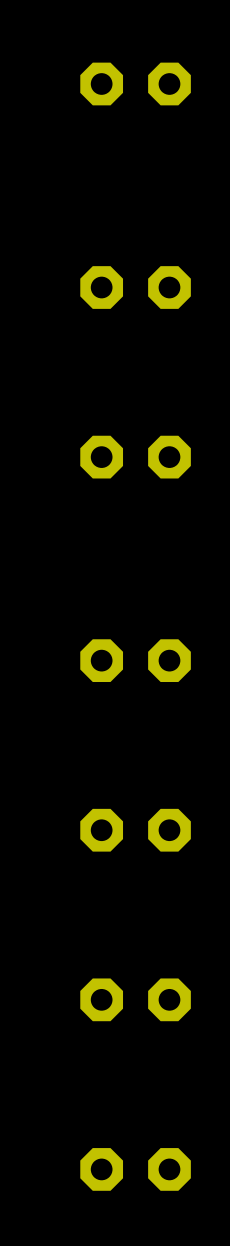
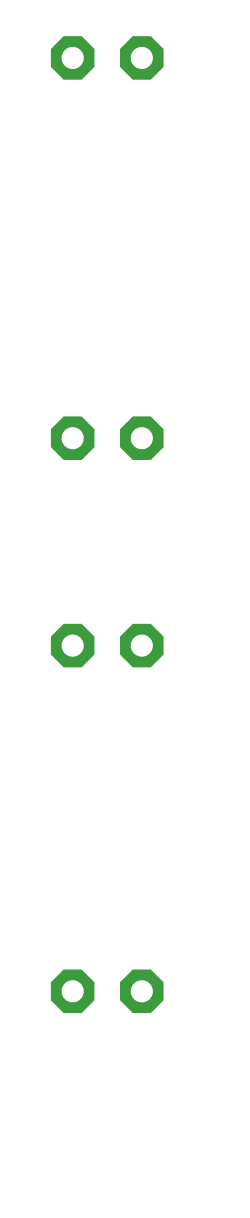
part: (135, 287) -> none
part: (135, 830) -> none
part: (135, 1169) -> none

